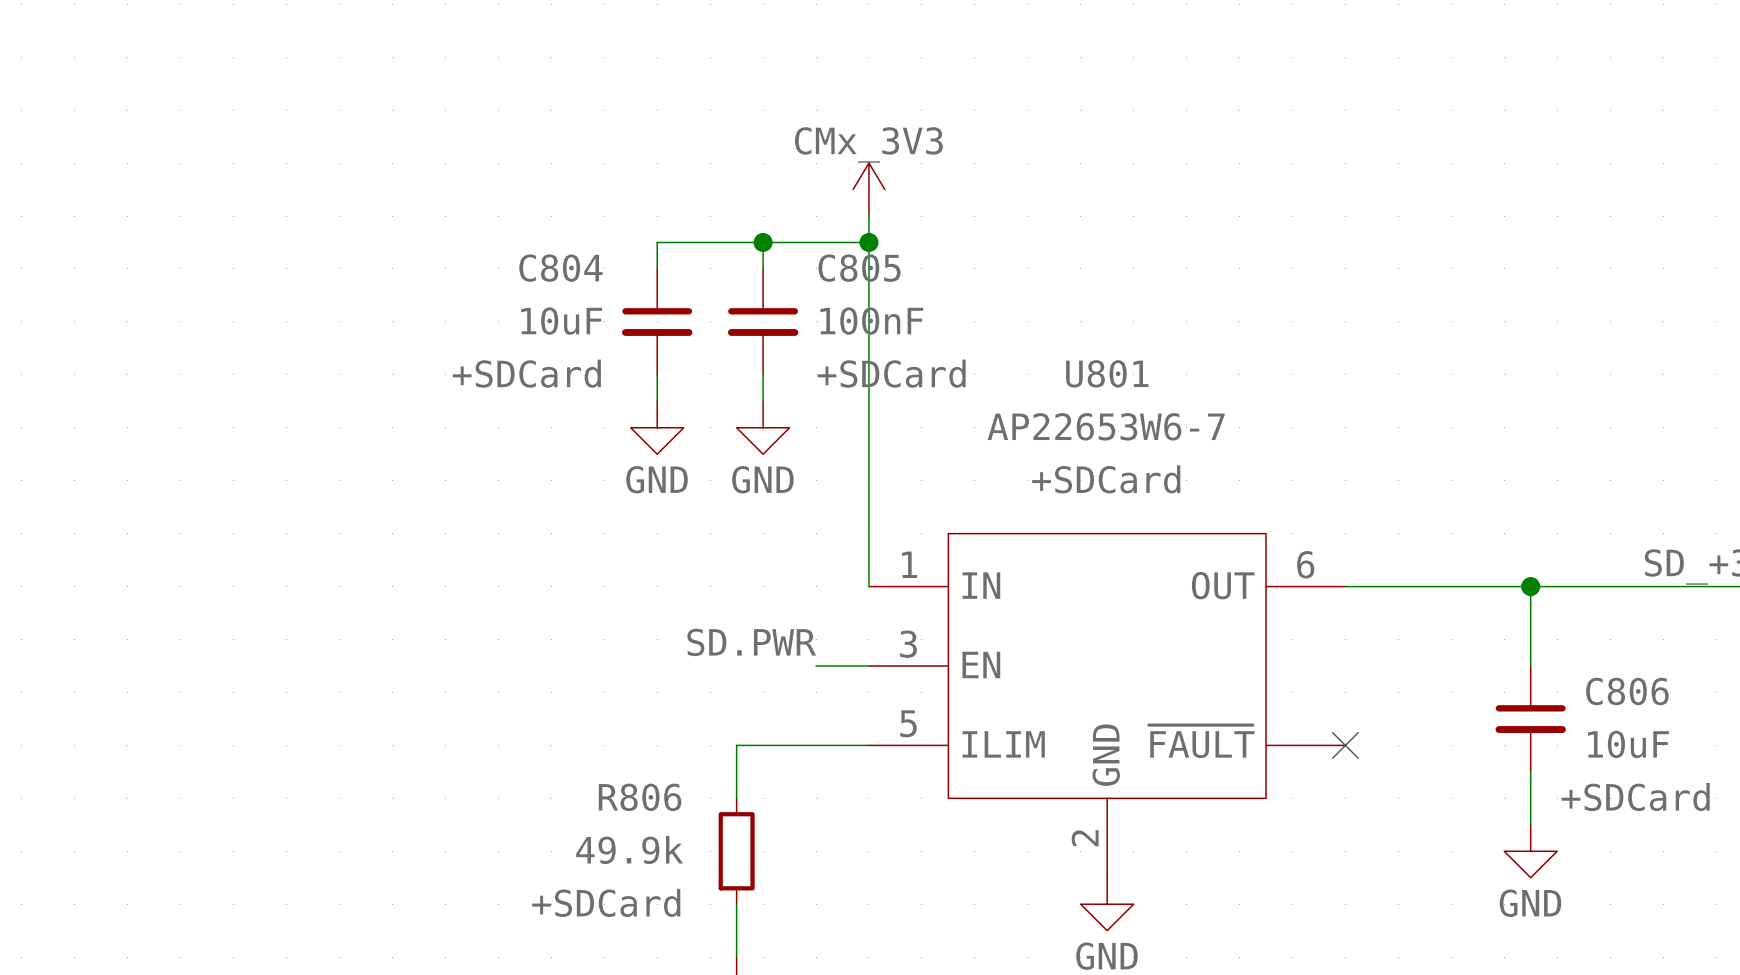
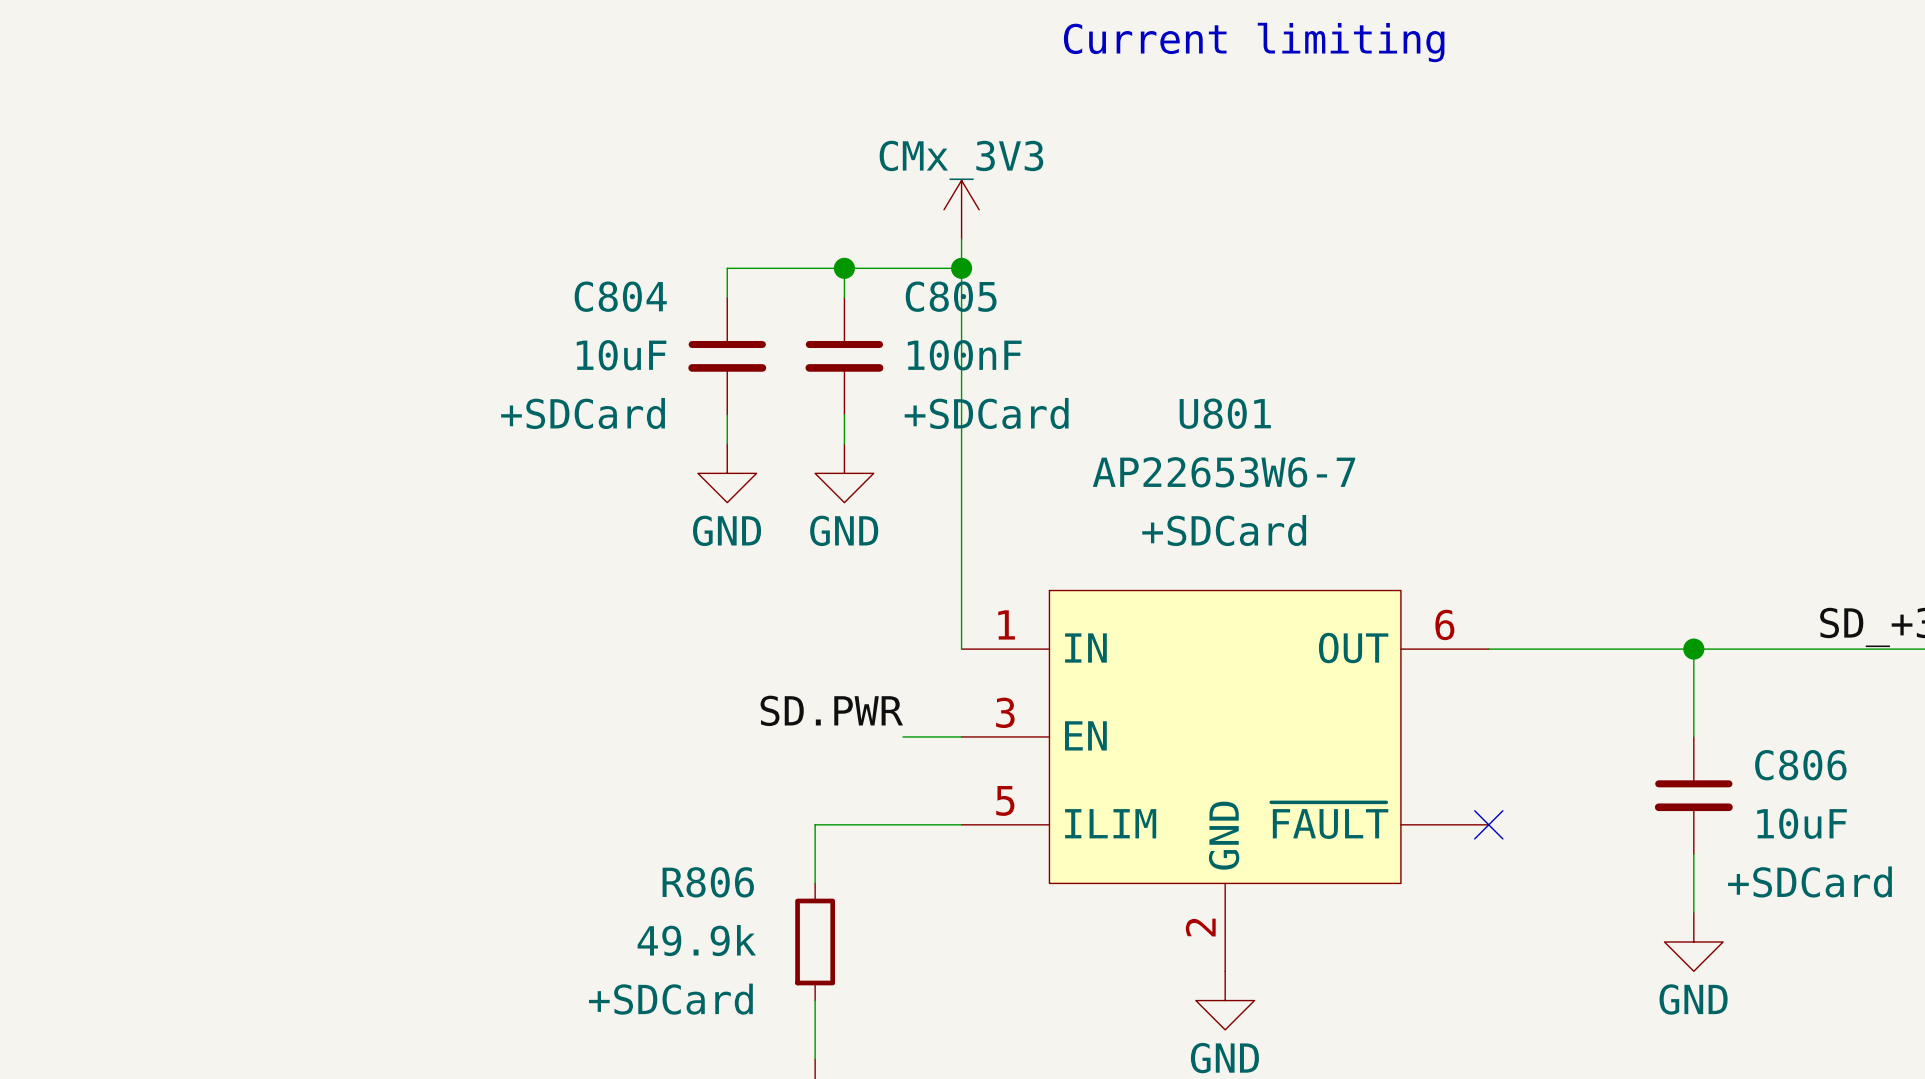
text: none -> Current limiting (1254, 42)

